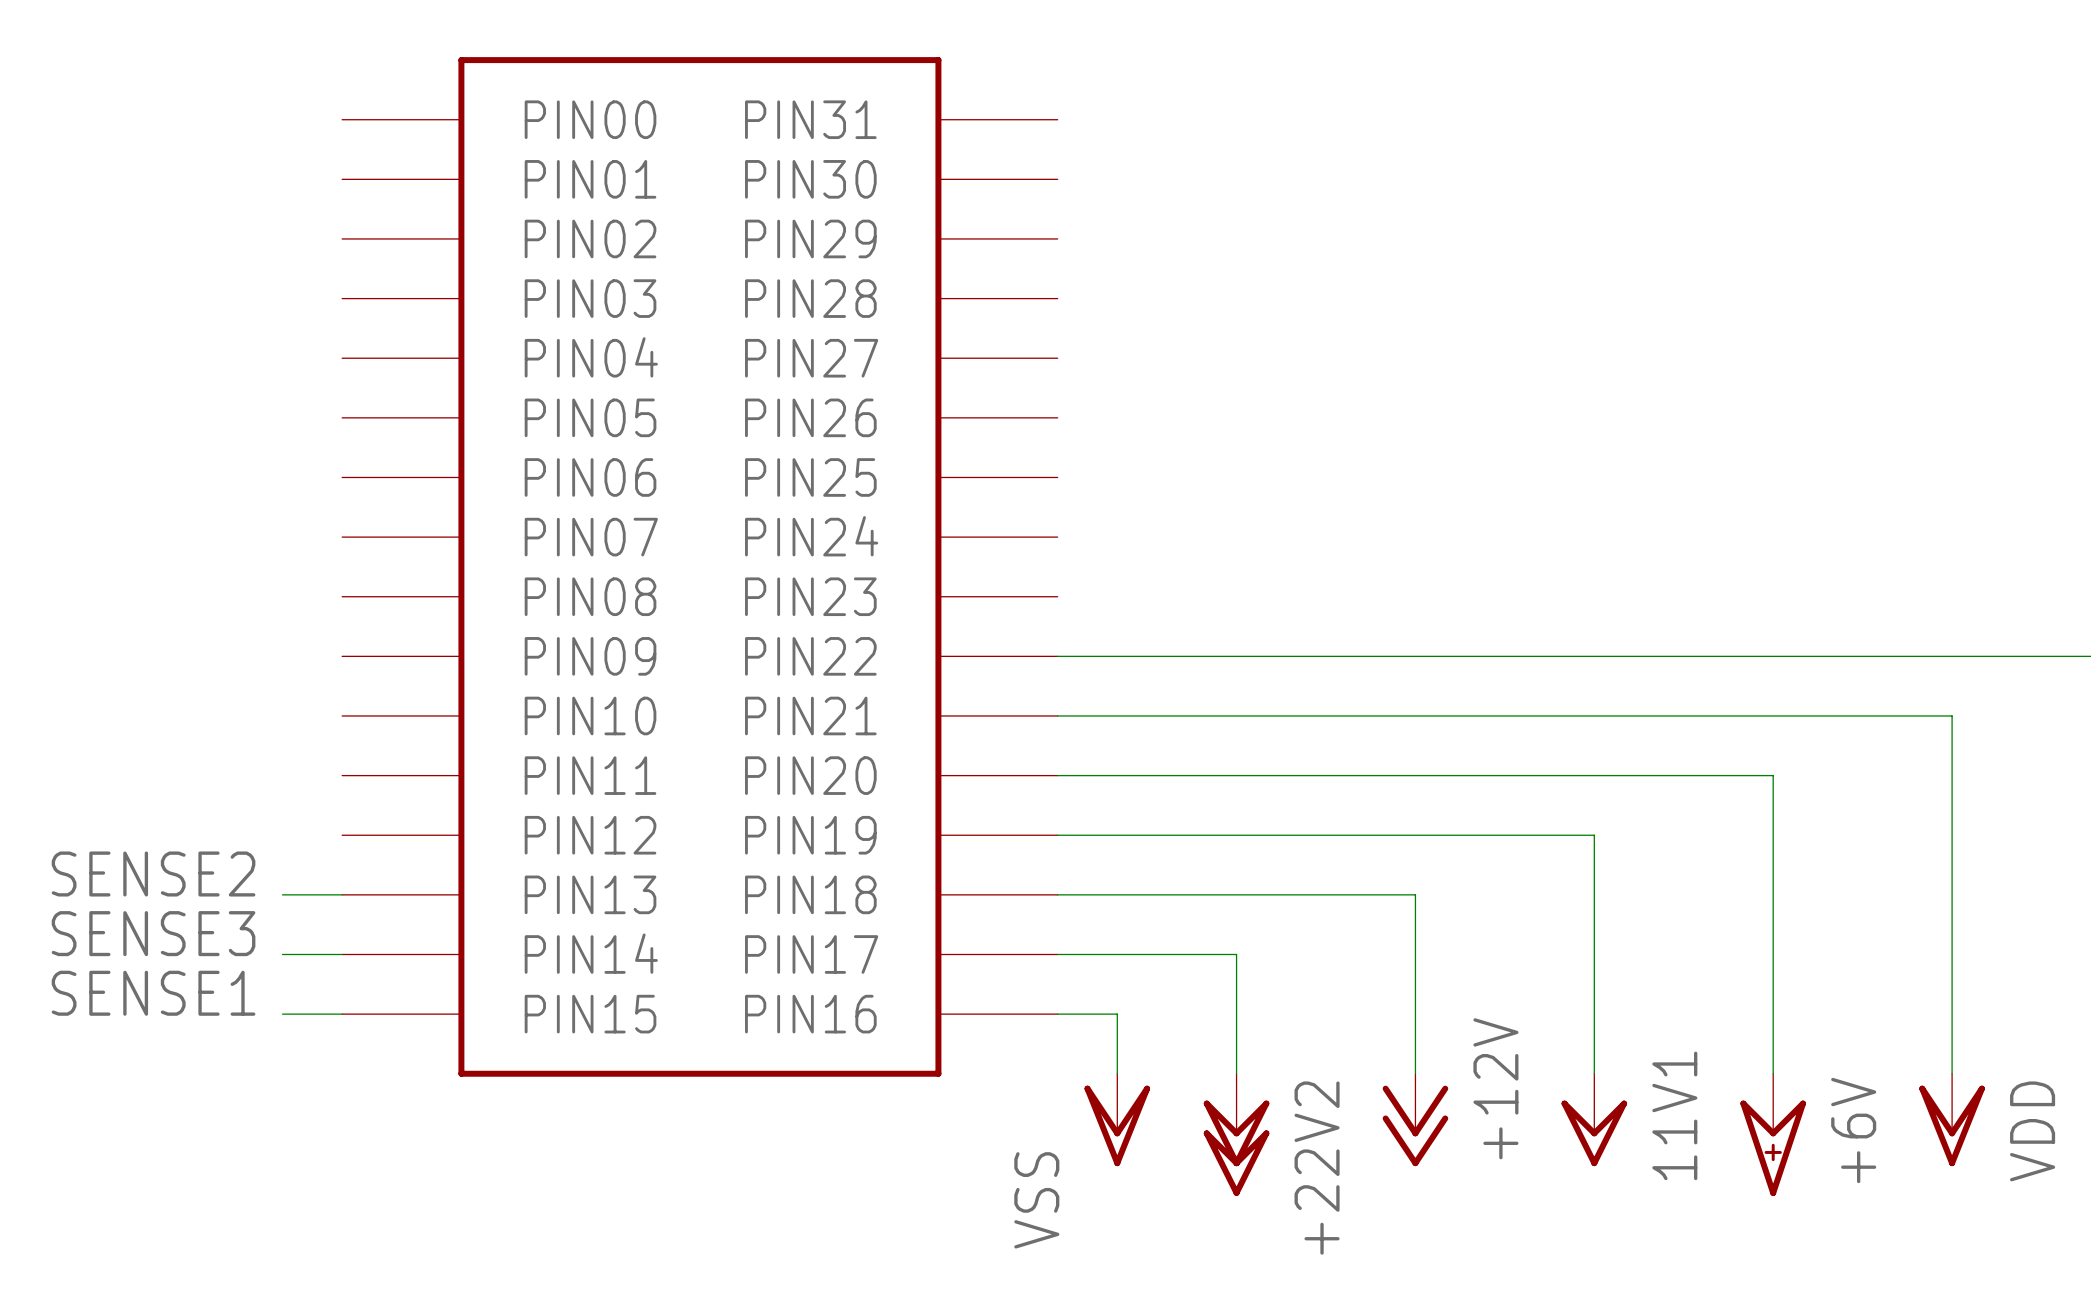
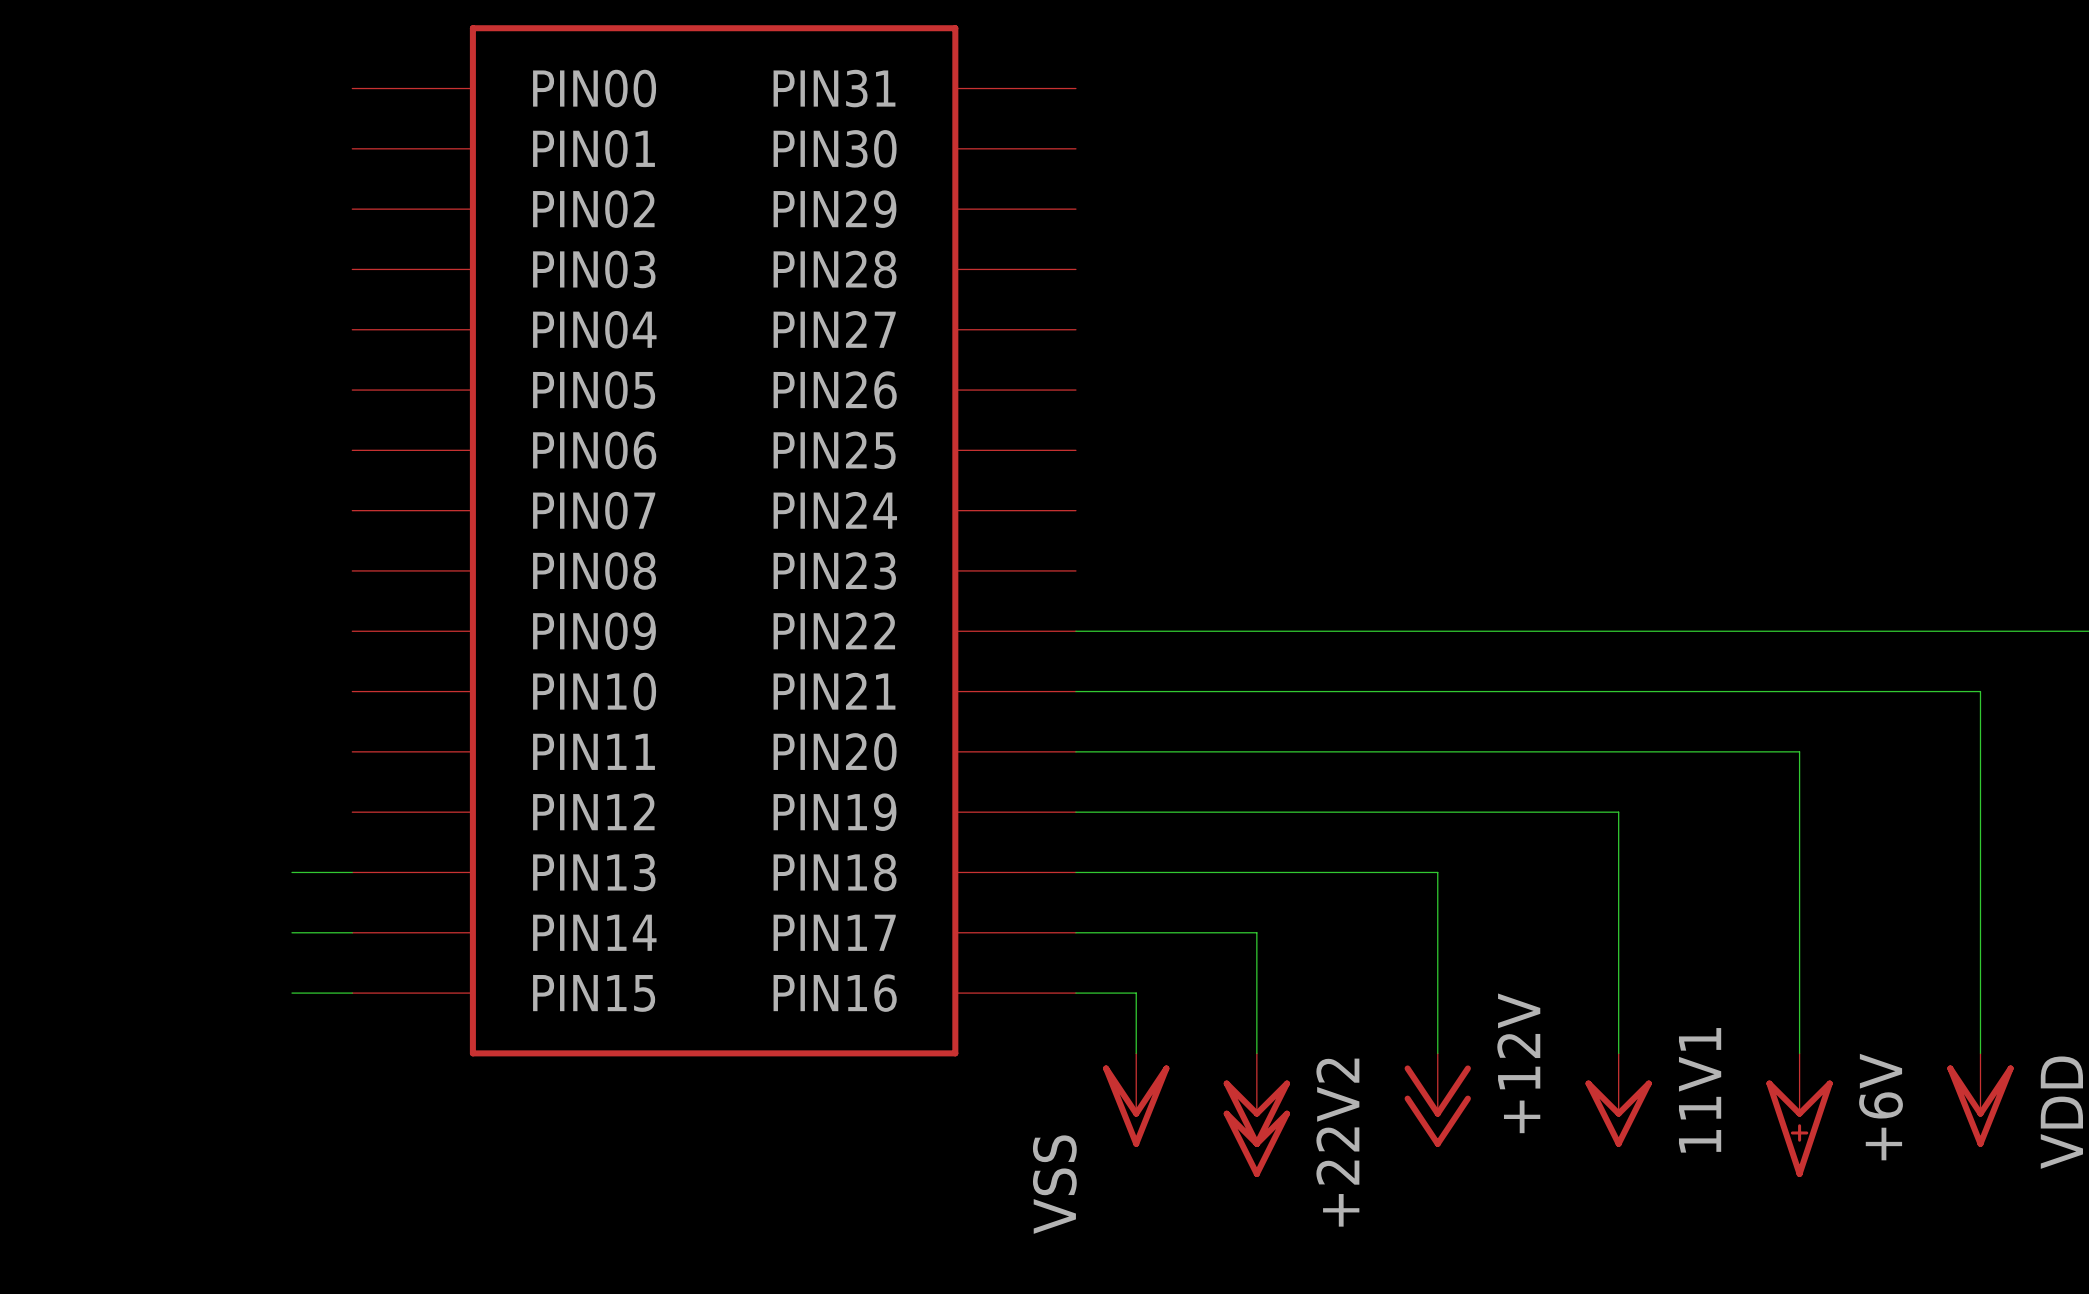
label: SENSE2 (153, 874) -> none
label: SENSE3 (153, 933) -> none
label: SENSE1 (153, 993) -> none

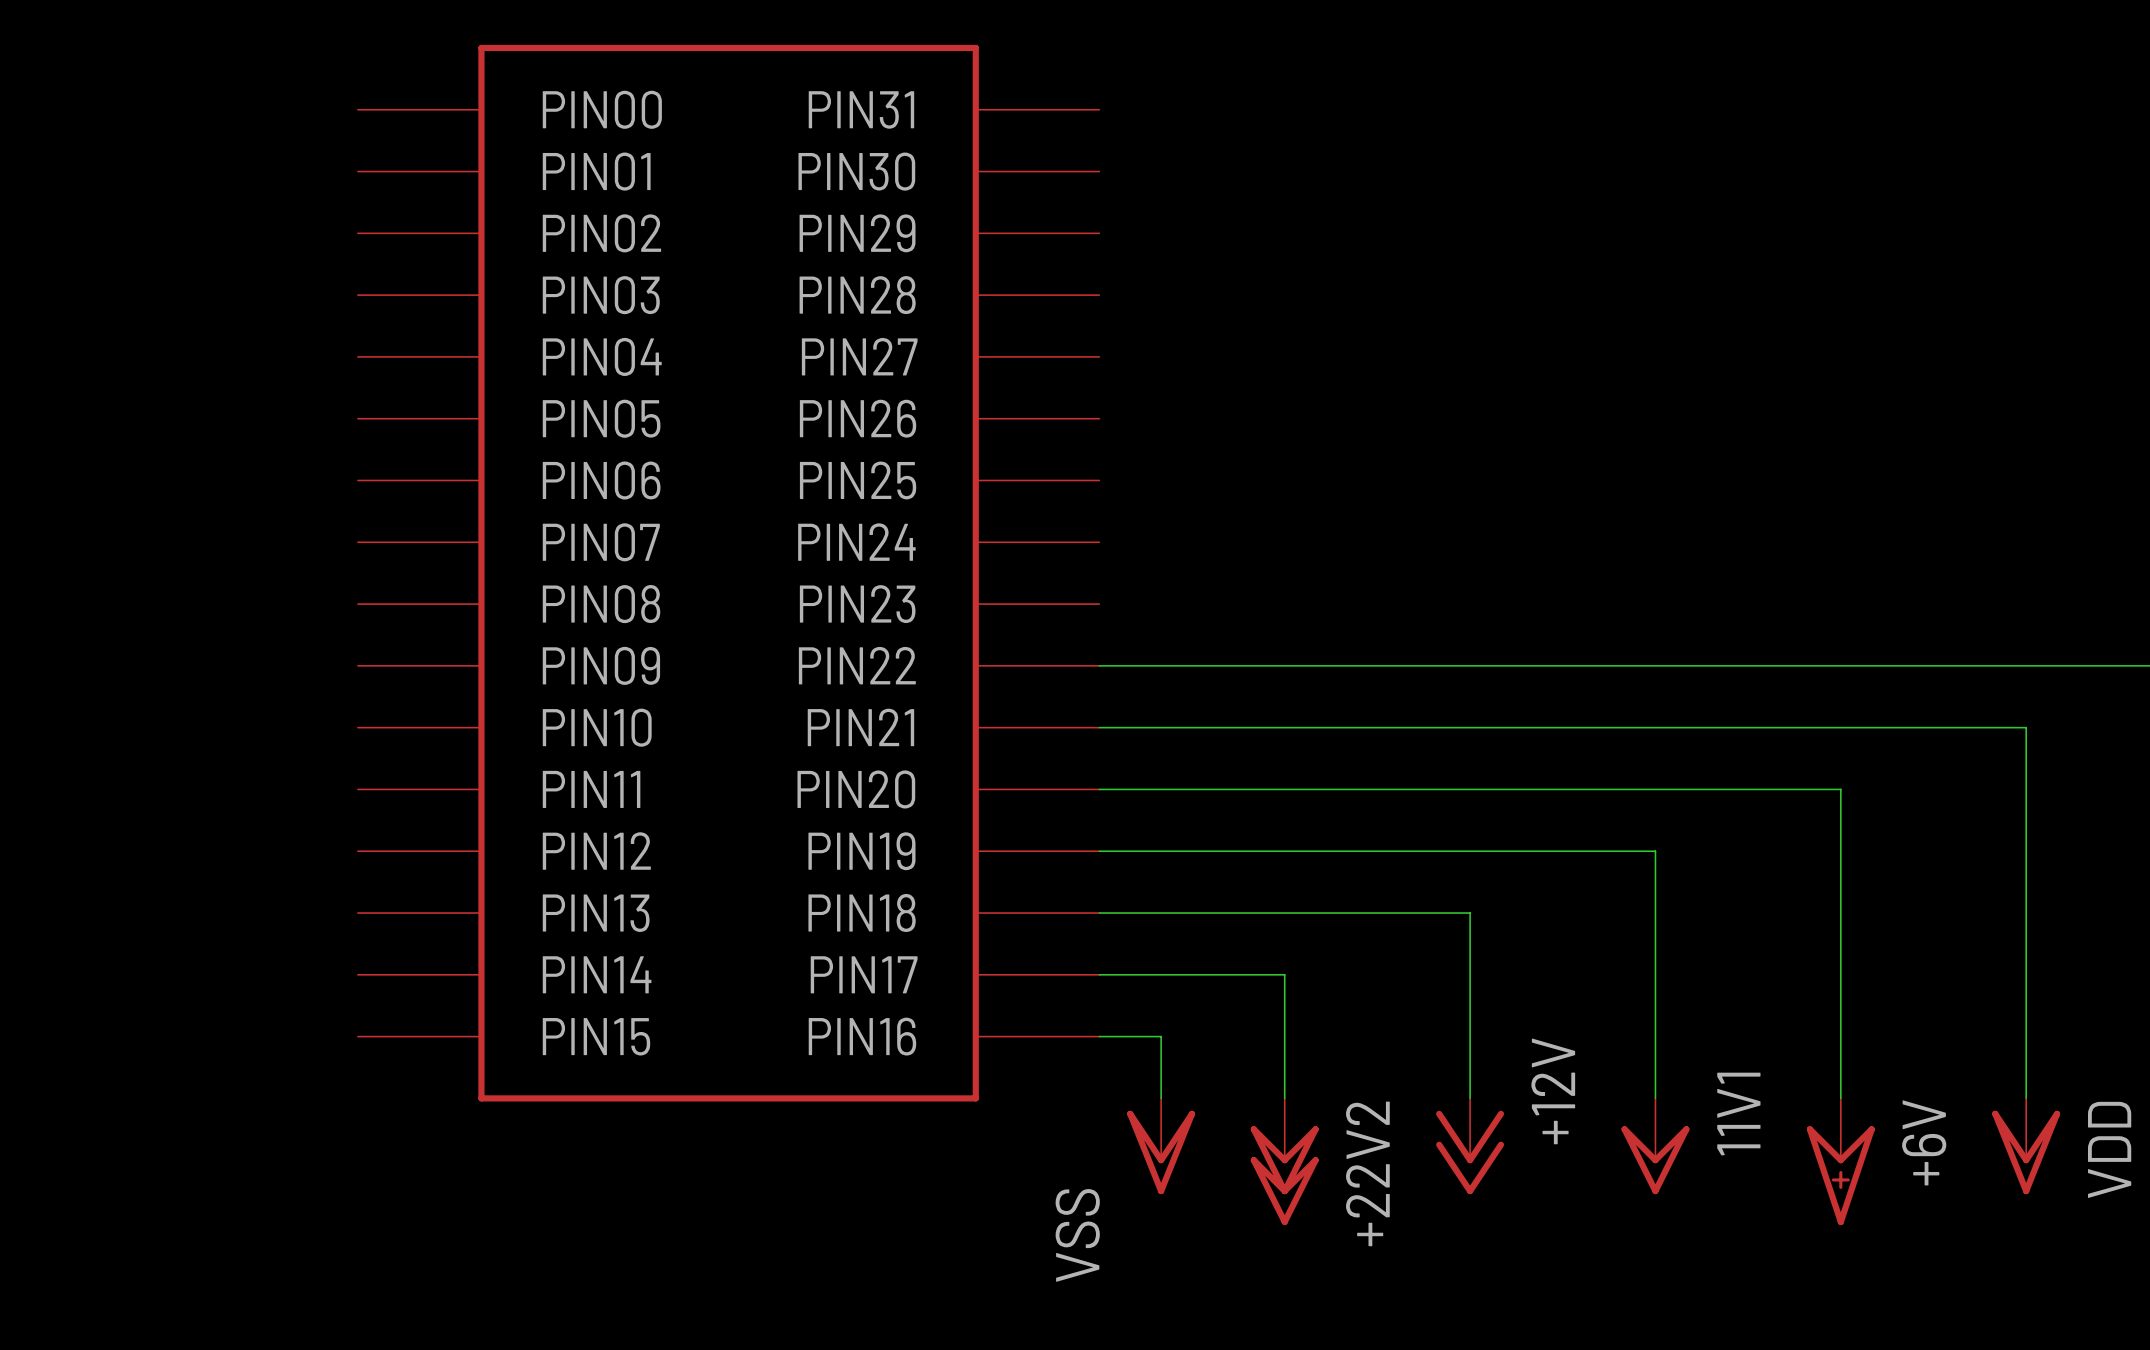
wire: (291, 872) (352, 872) -> none
wire: (291, 932) (352, 932) -> none
wire: (291, 993) (352, 993) -> none

